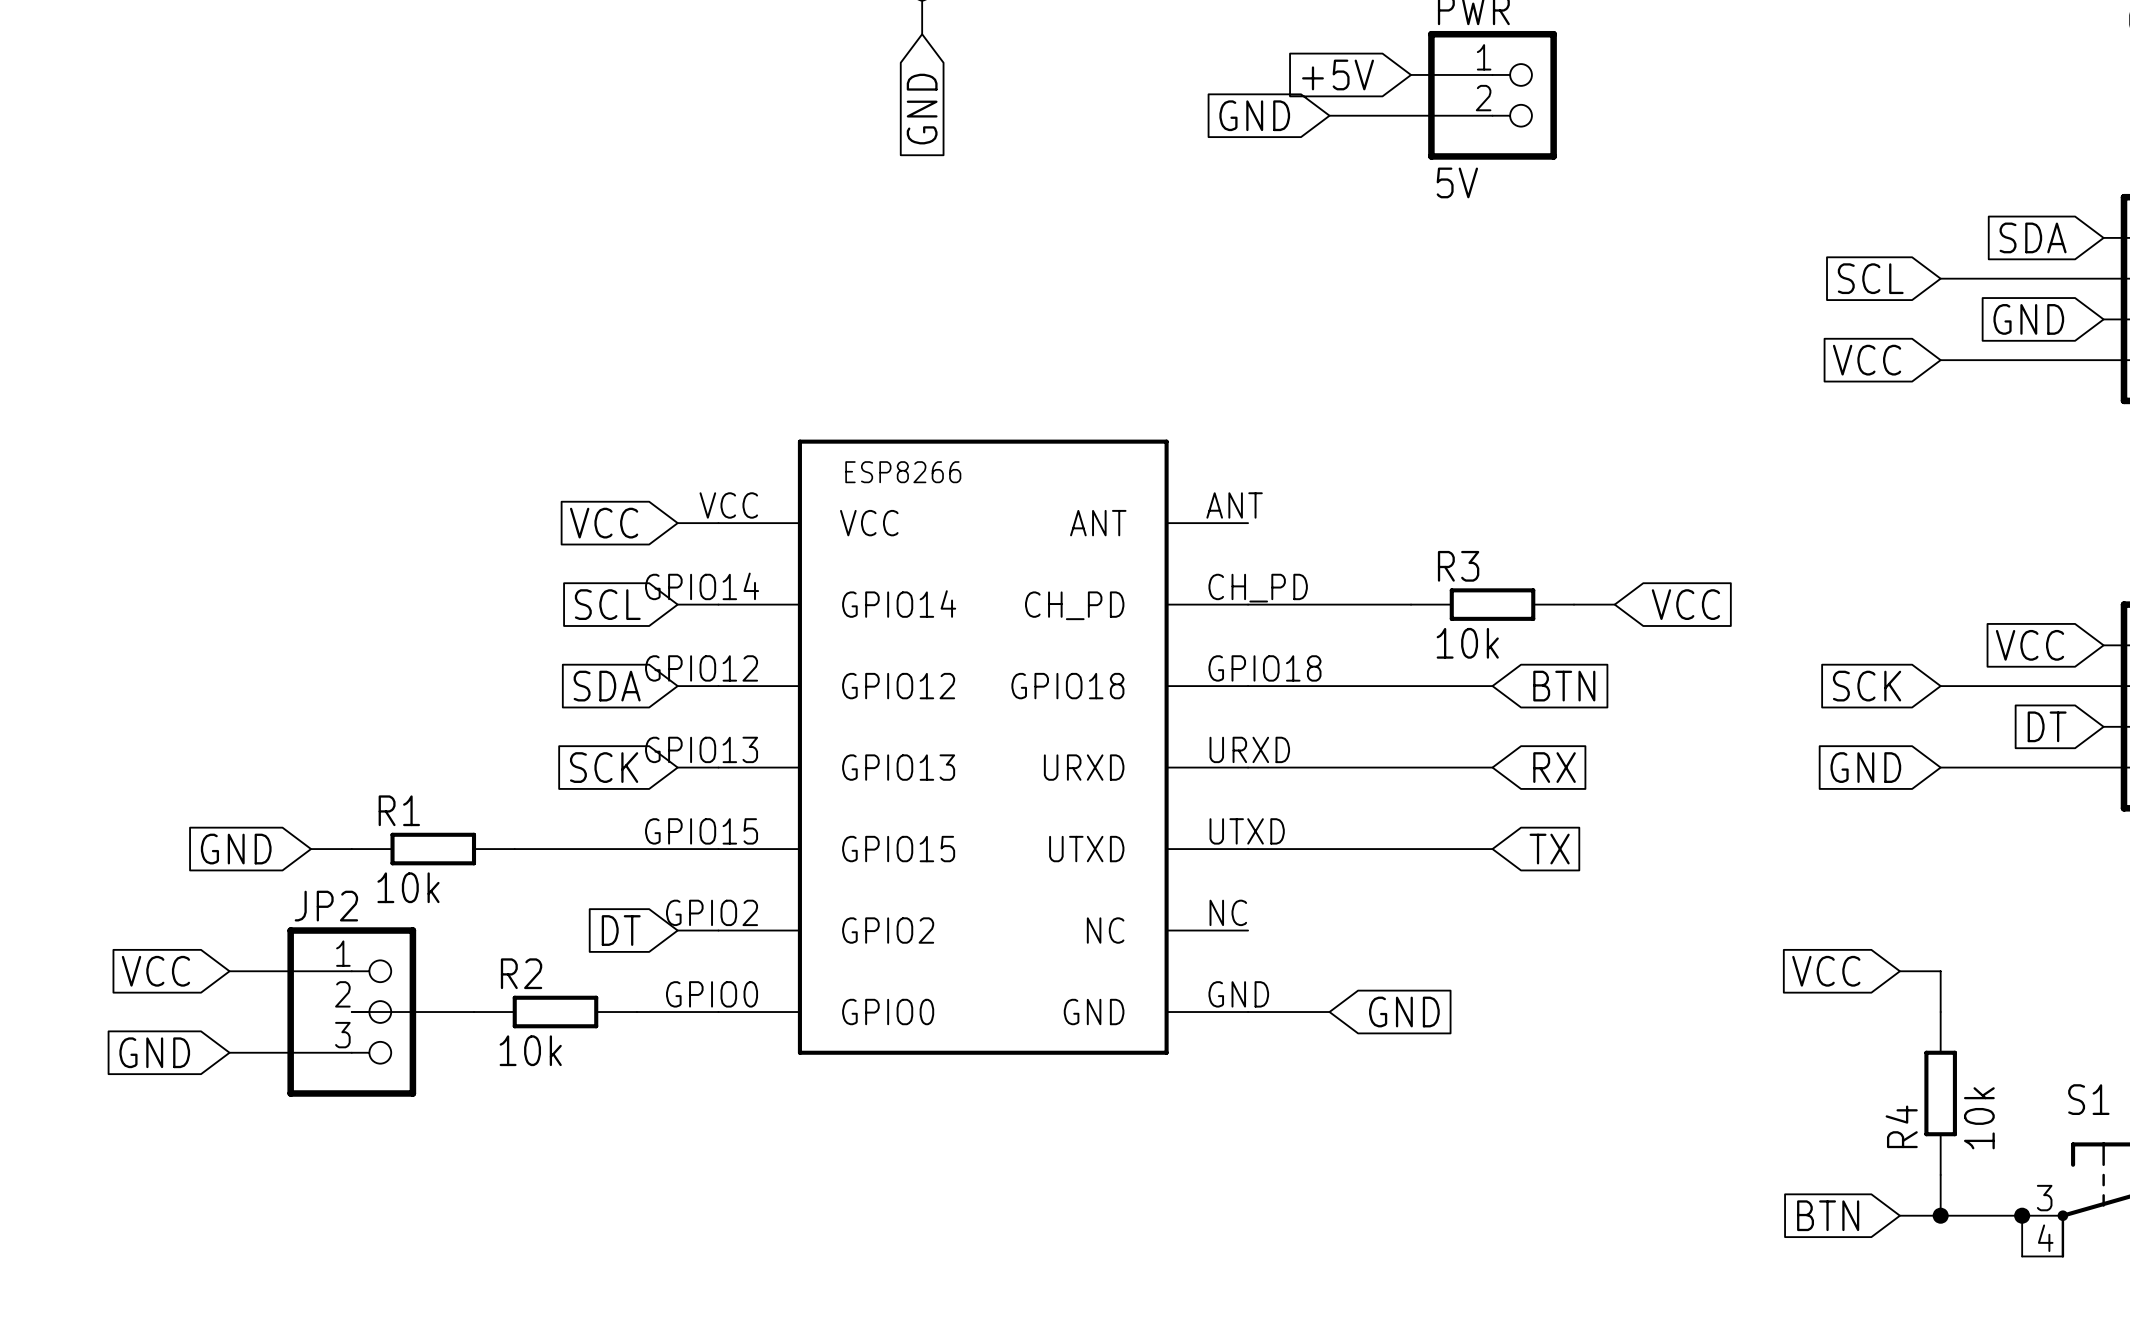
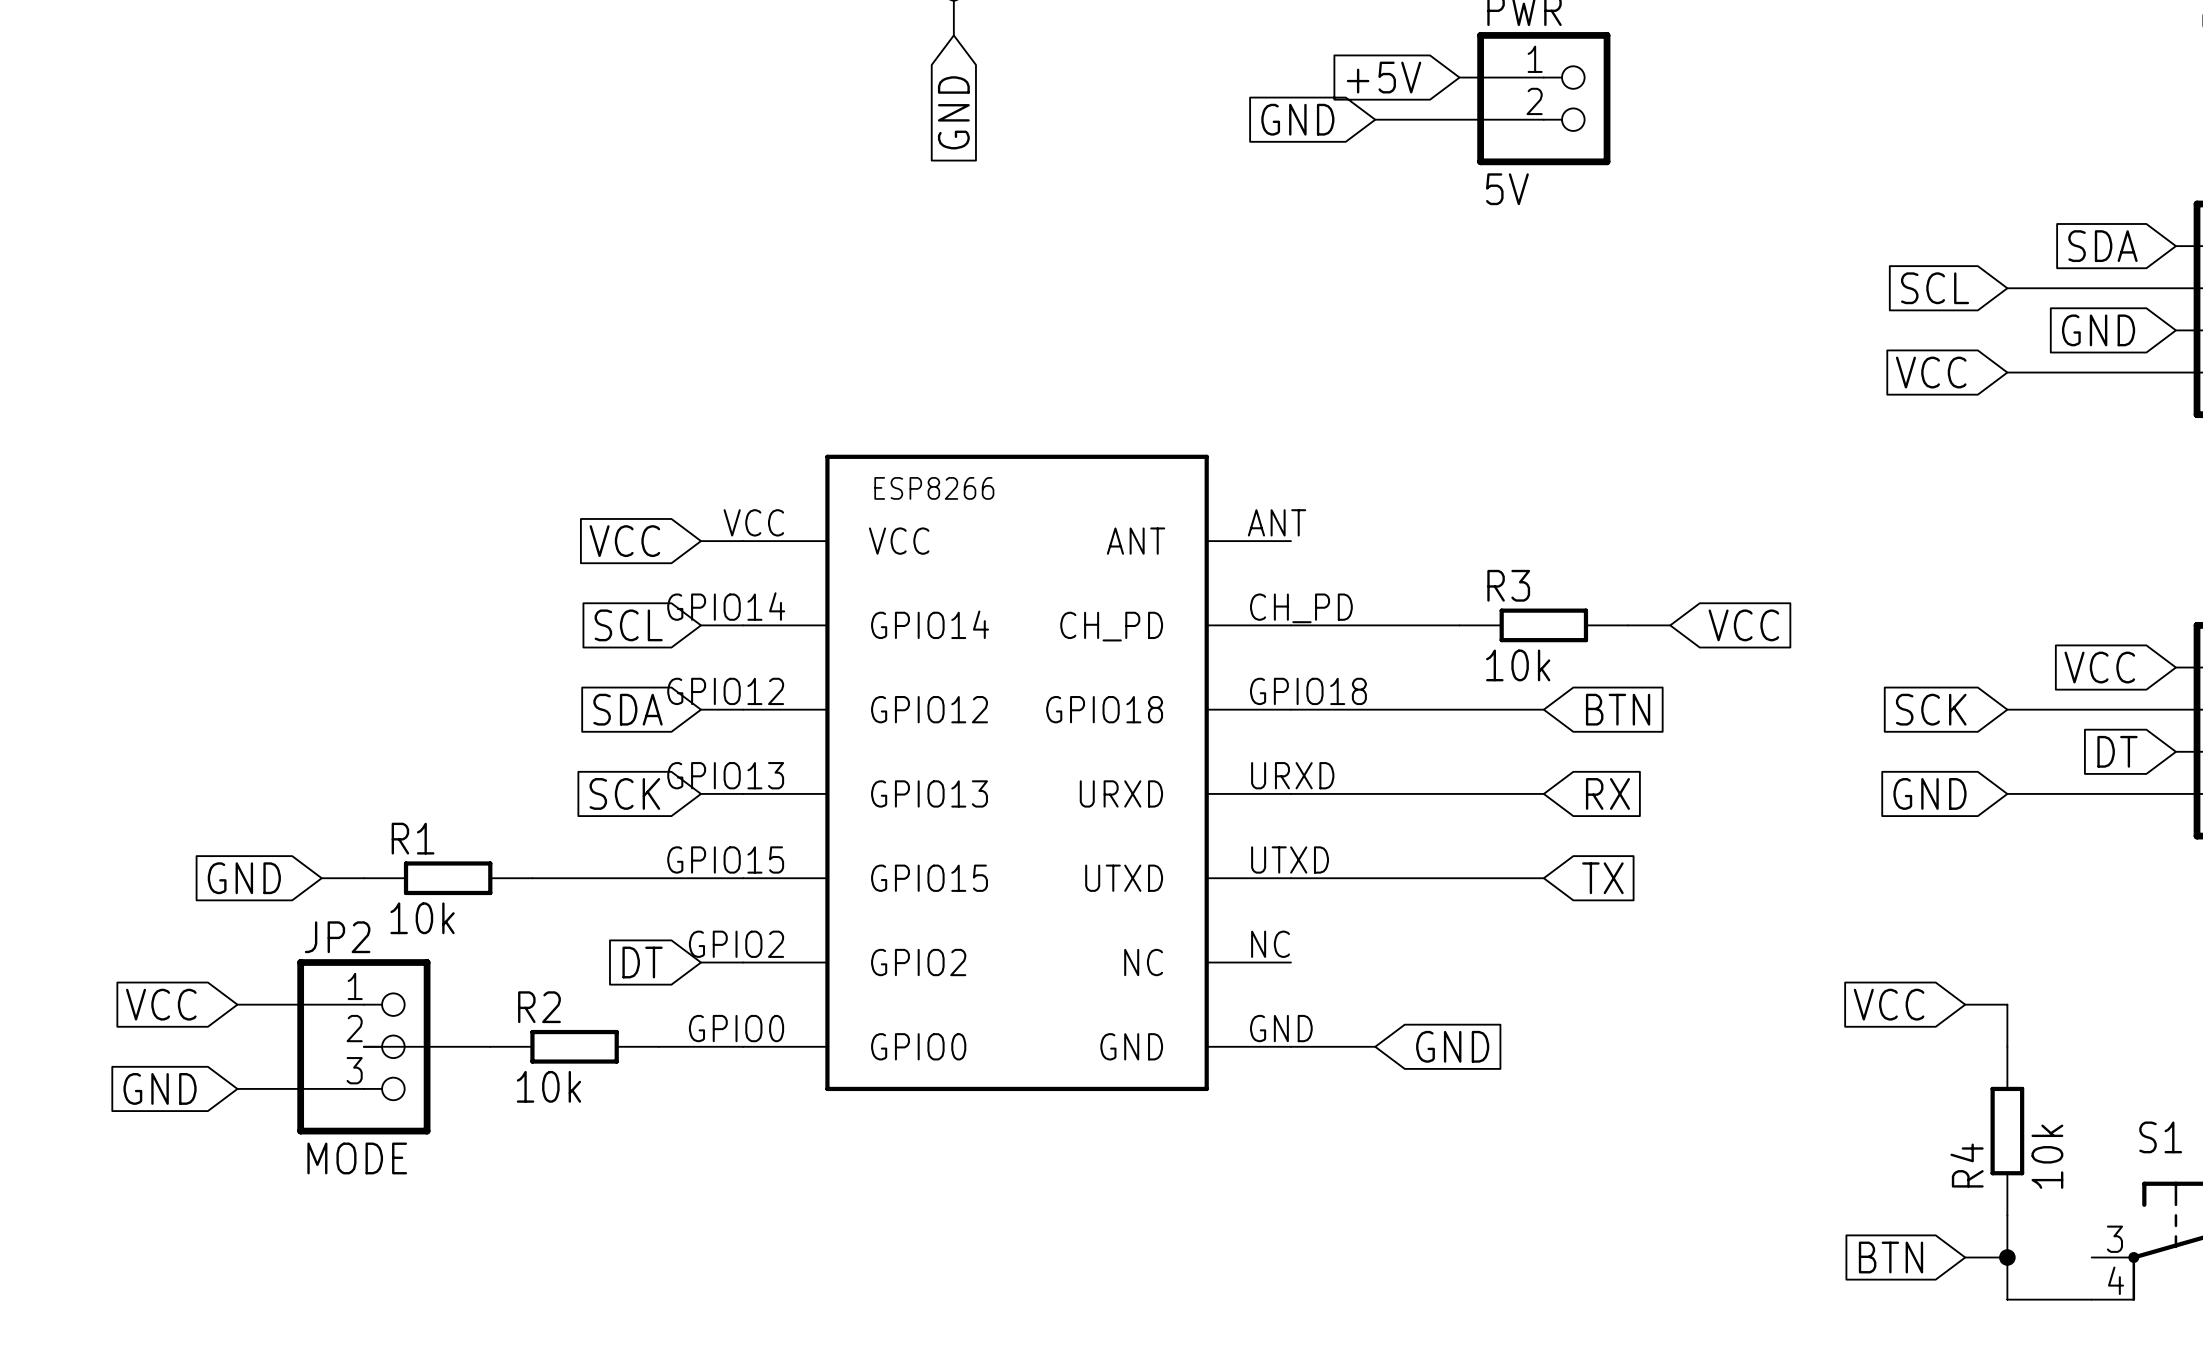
JP2 value: none -> MODE (357, 1158)
wire: (1940, 1215) (2022, 1215) (2022, 1256) -> (2007, 1257) (2007, 1299) (2091, 1299)
junction: (2022, 1215) -> none

